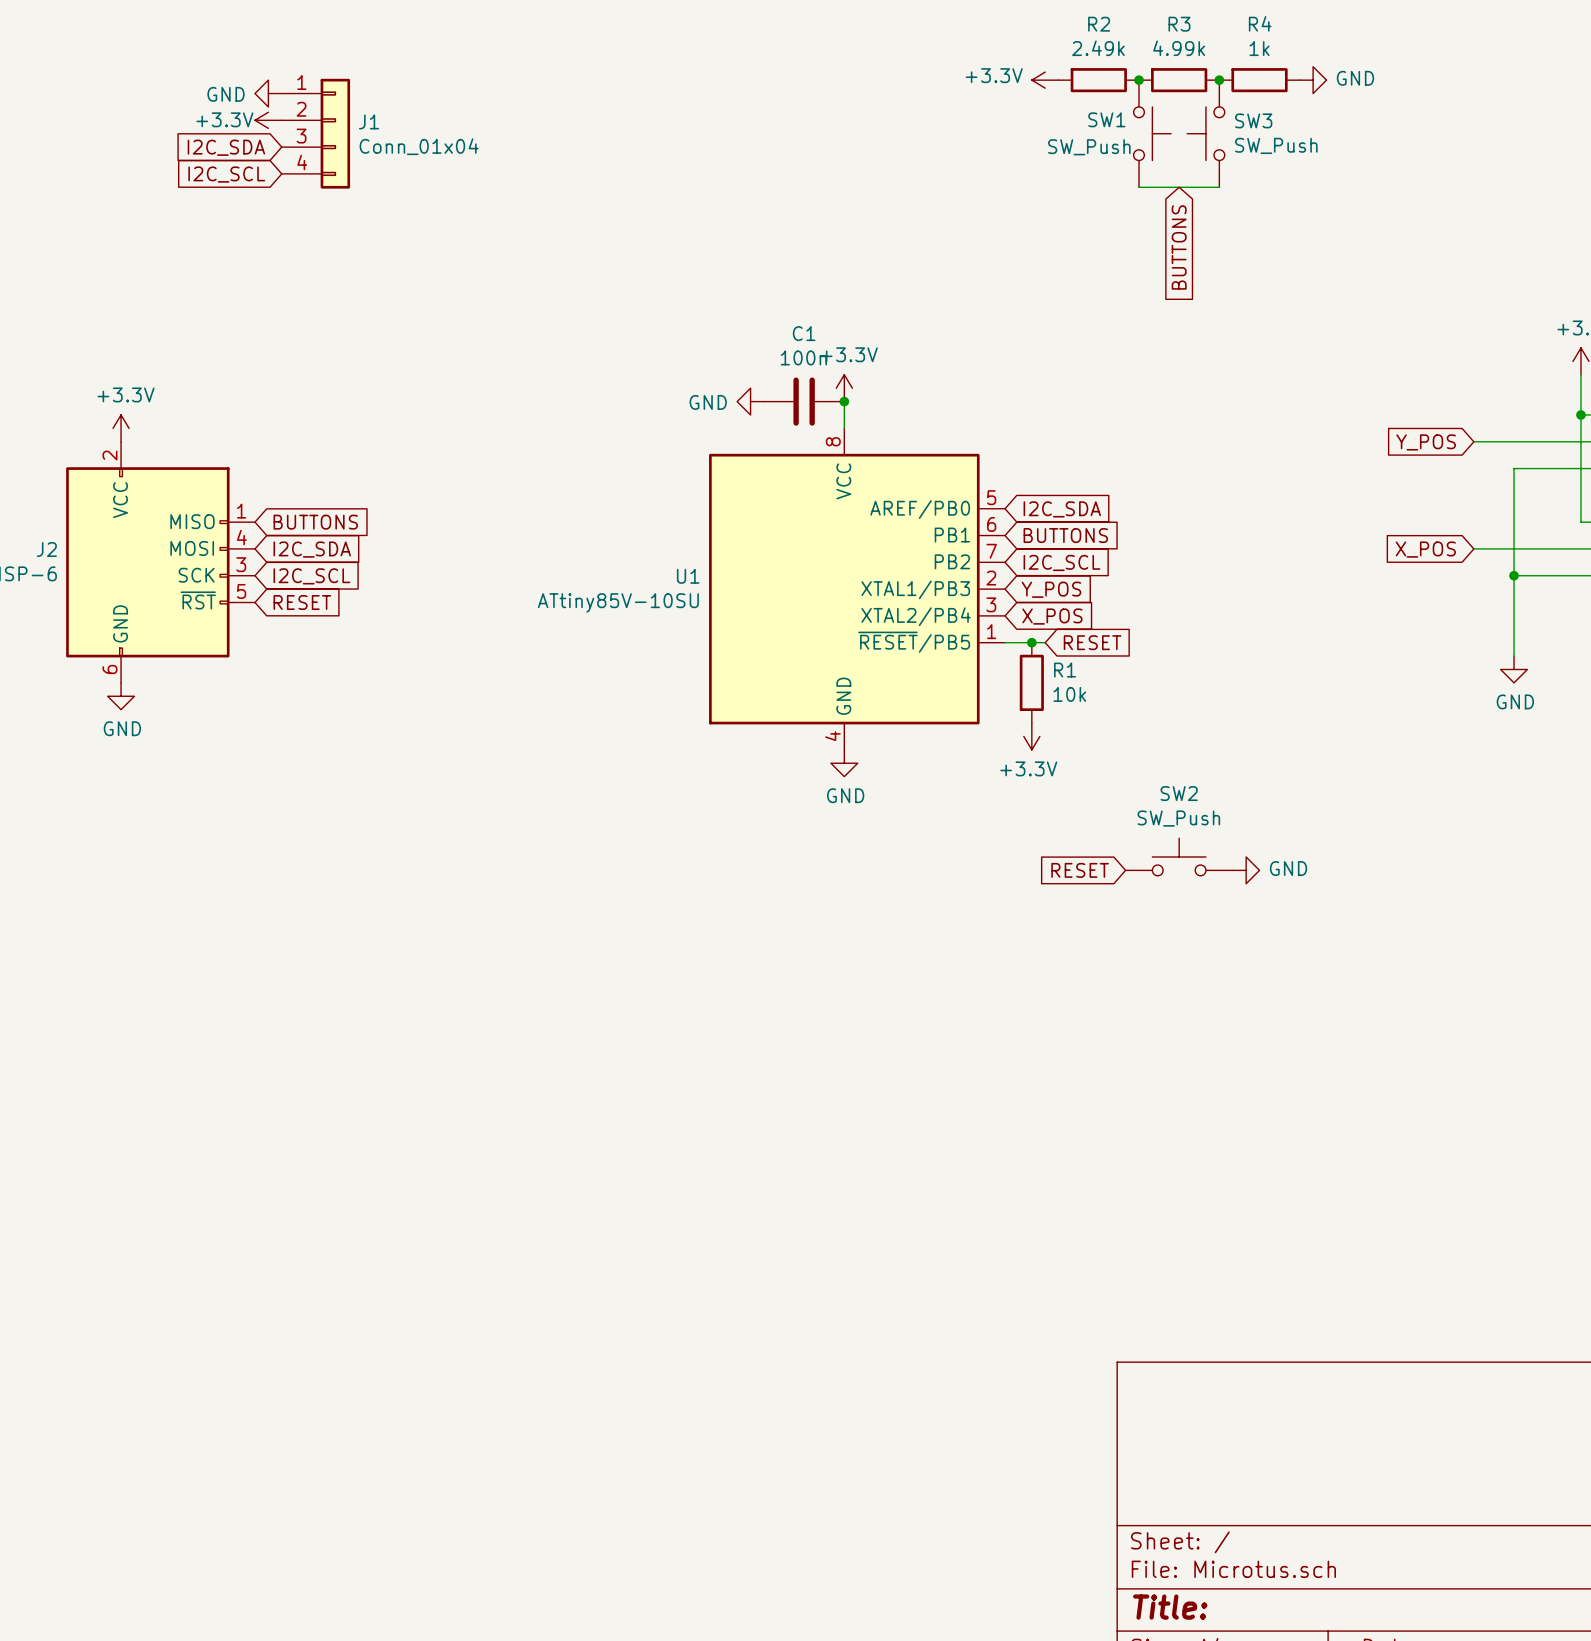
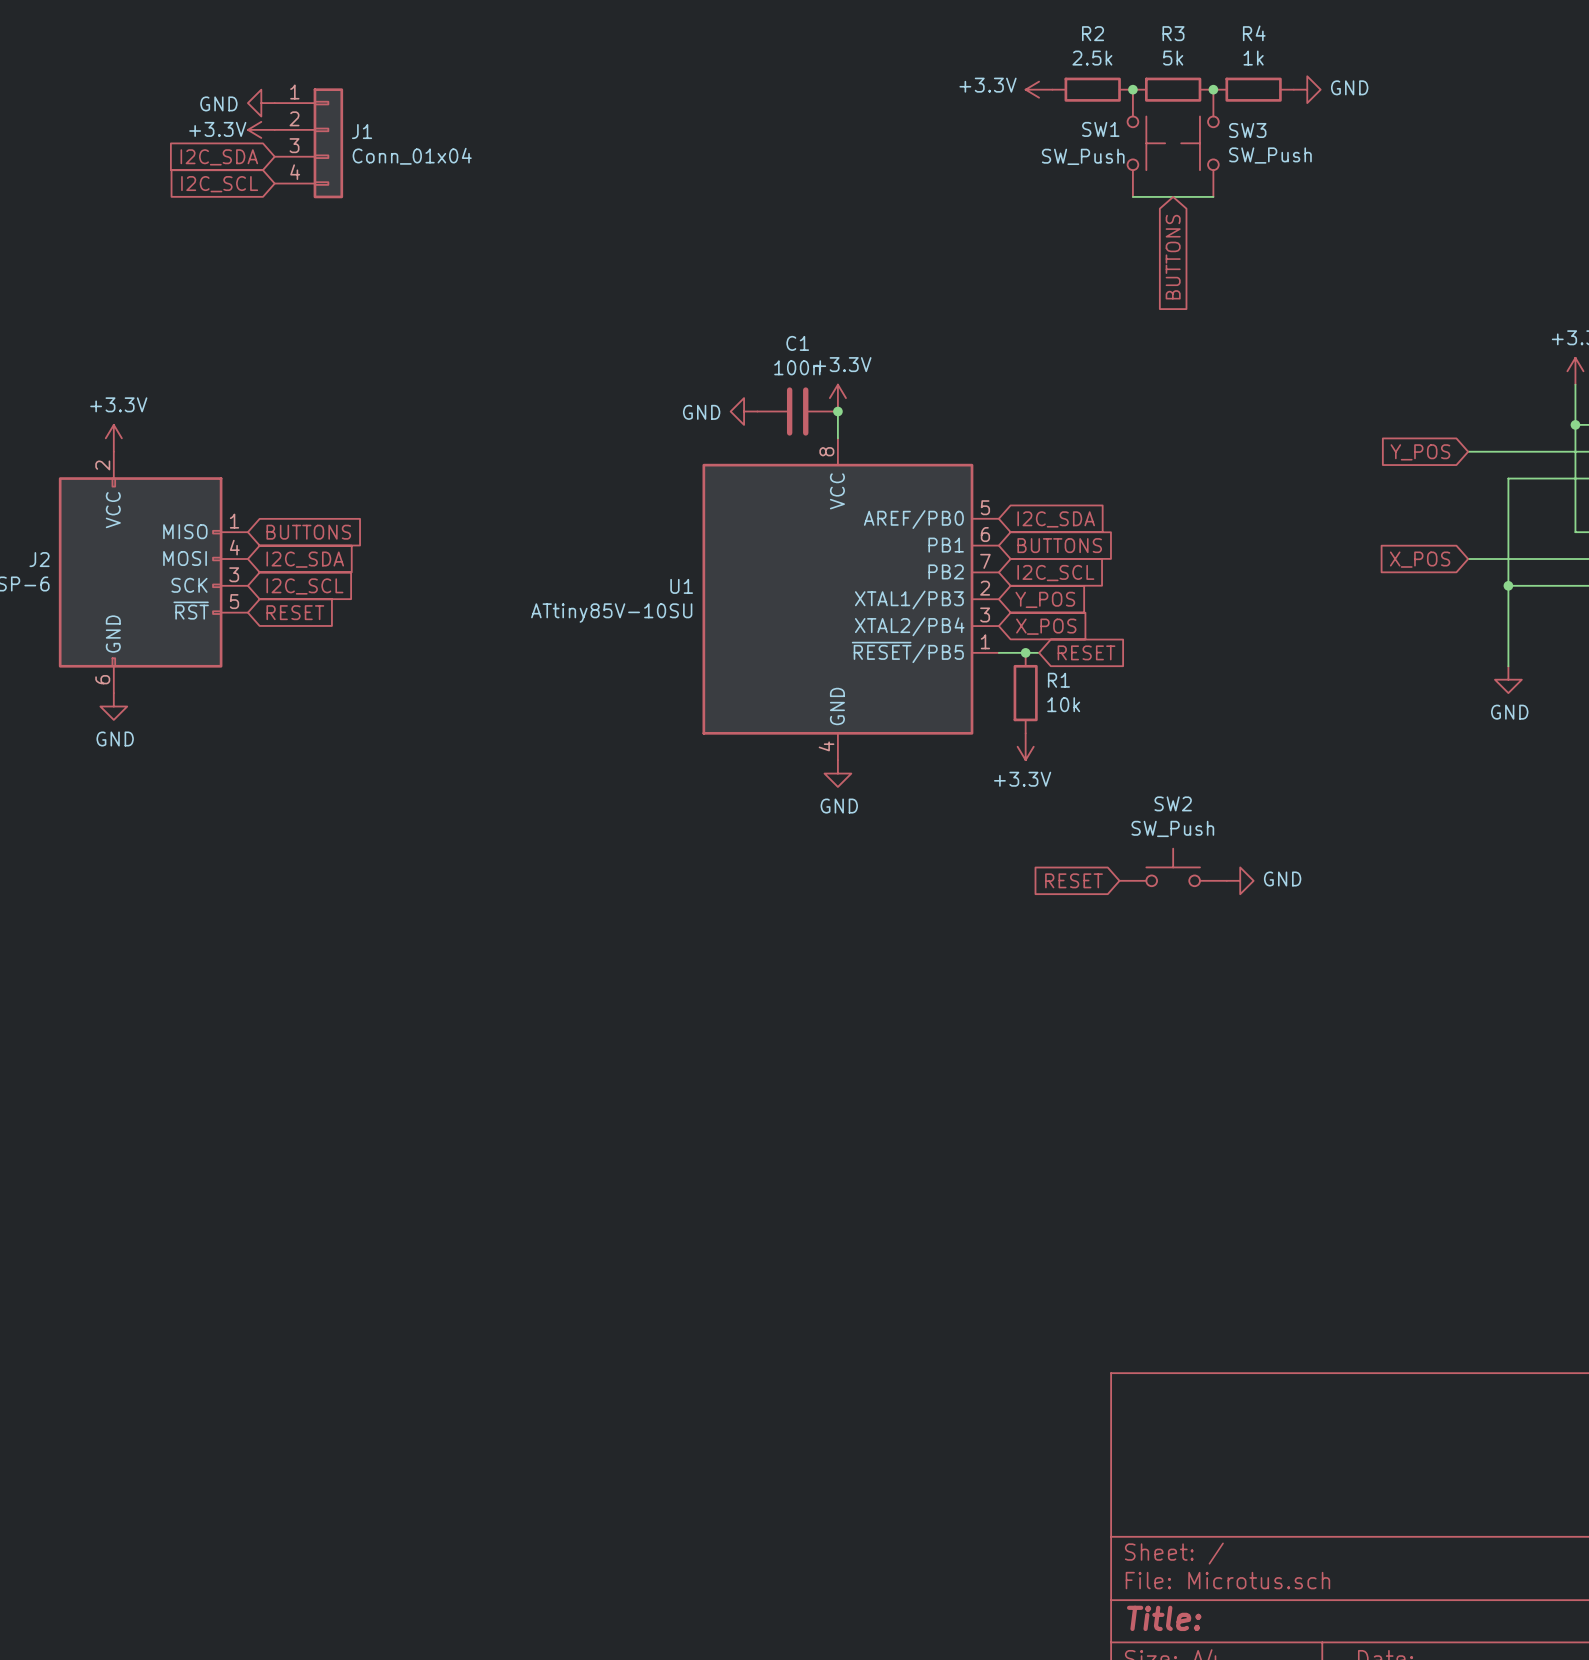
R2 value: 2.49k (1098, 48) -> 2.5k (1092, 58)
R3 value: 4.99k (1179, 48) -> 5k (1173, 58)

